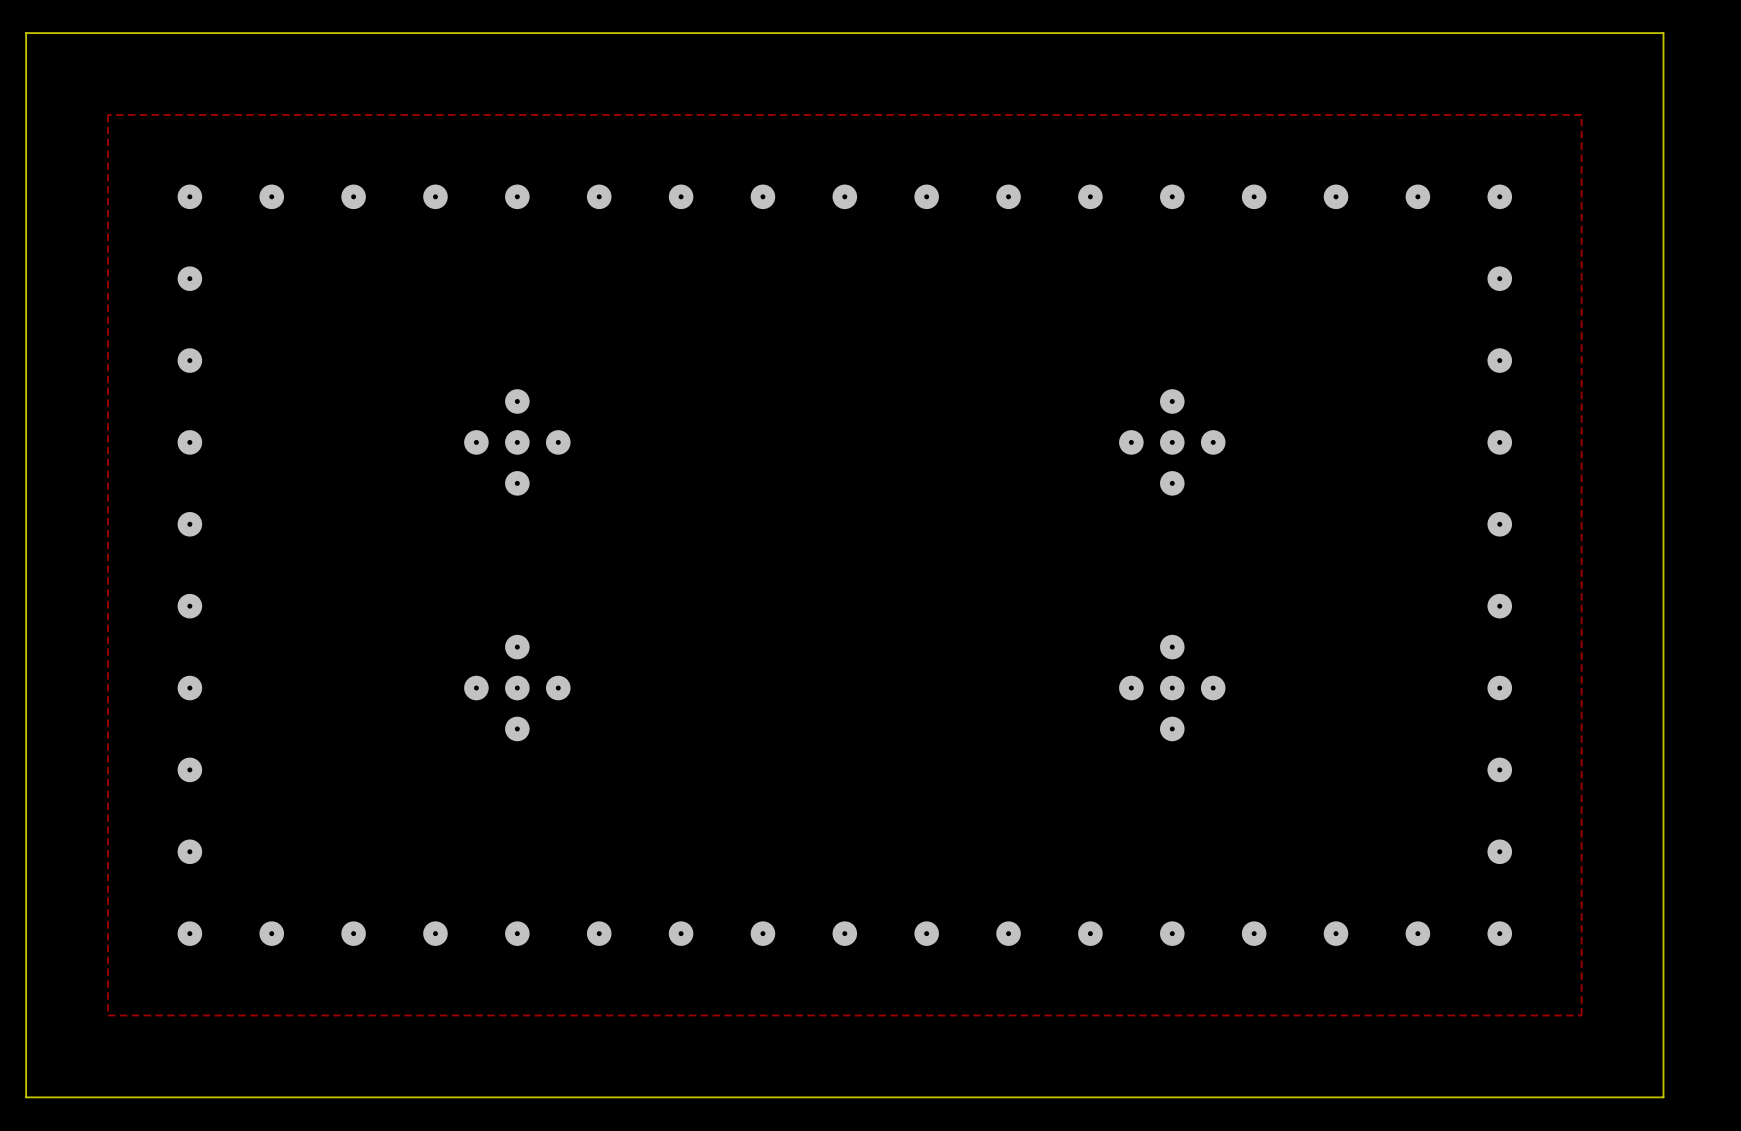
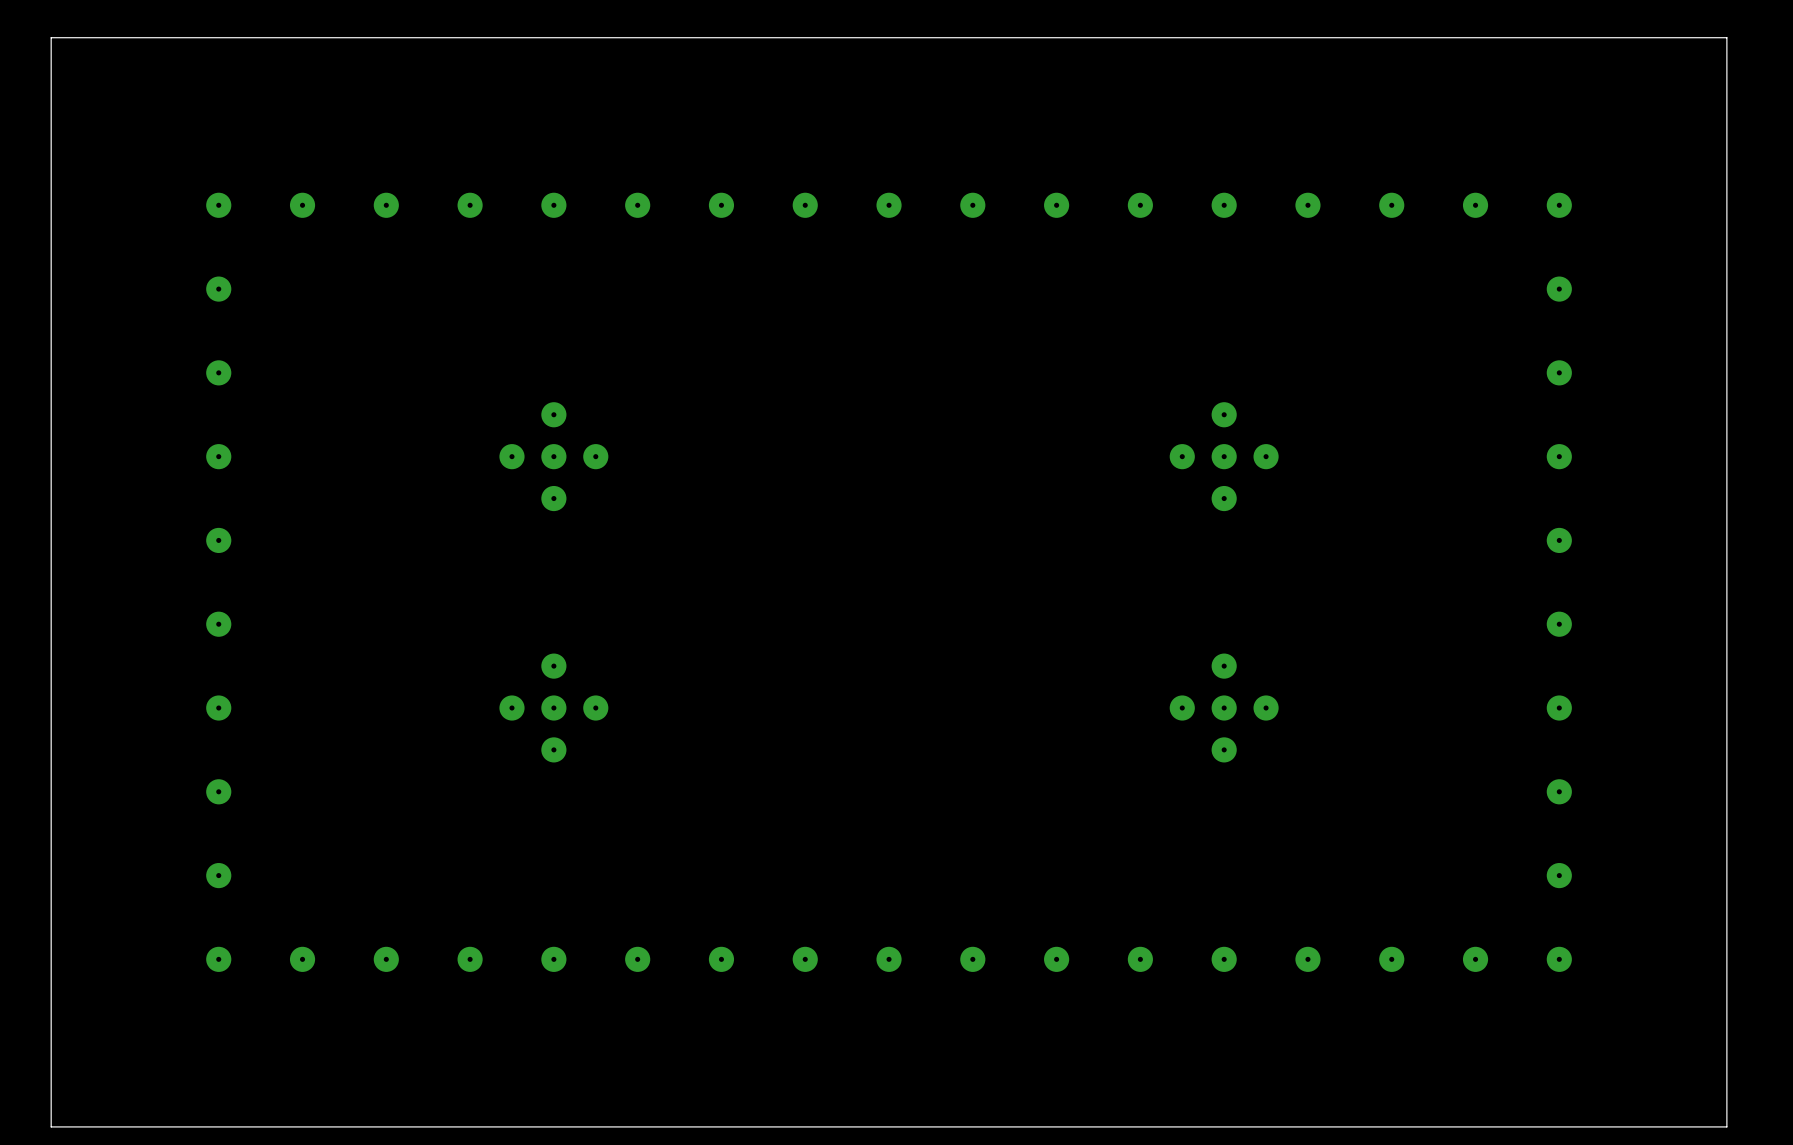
zone outline: (108, 114) (1581, 114) (1581, 1015) (108, 1015) (108, 114) -> none

